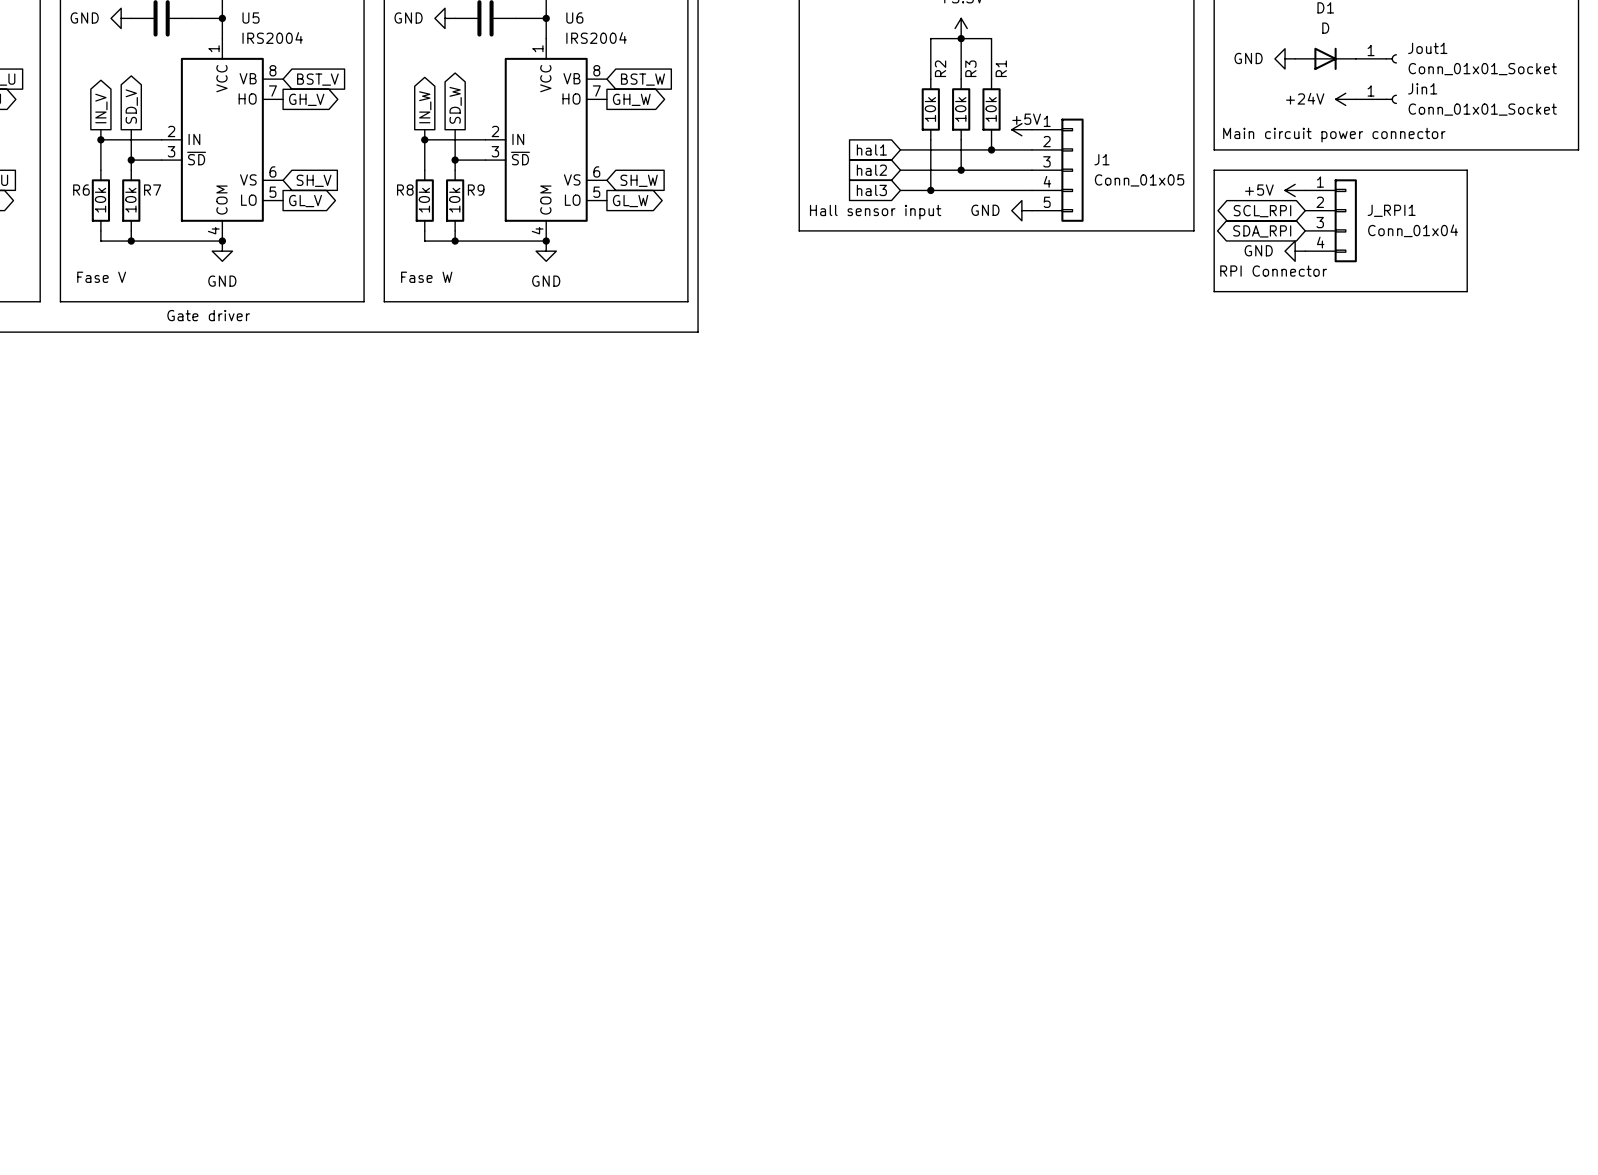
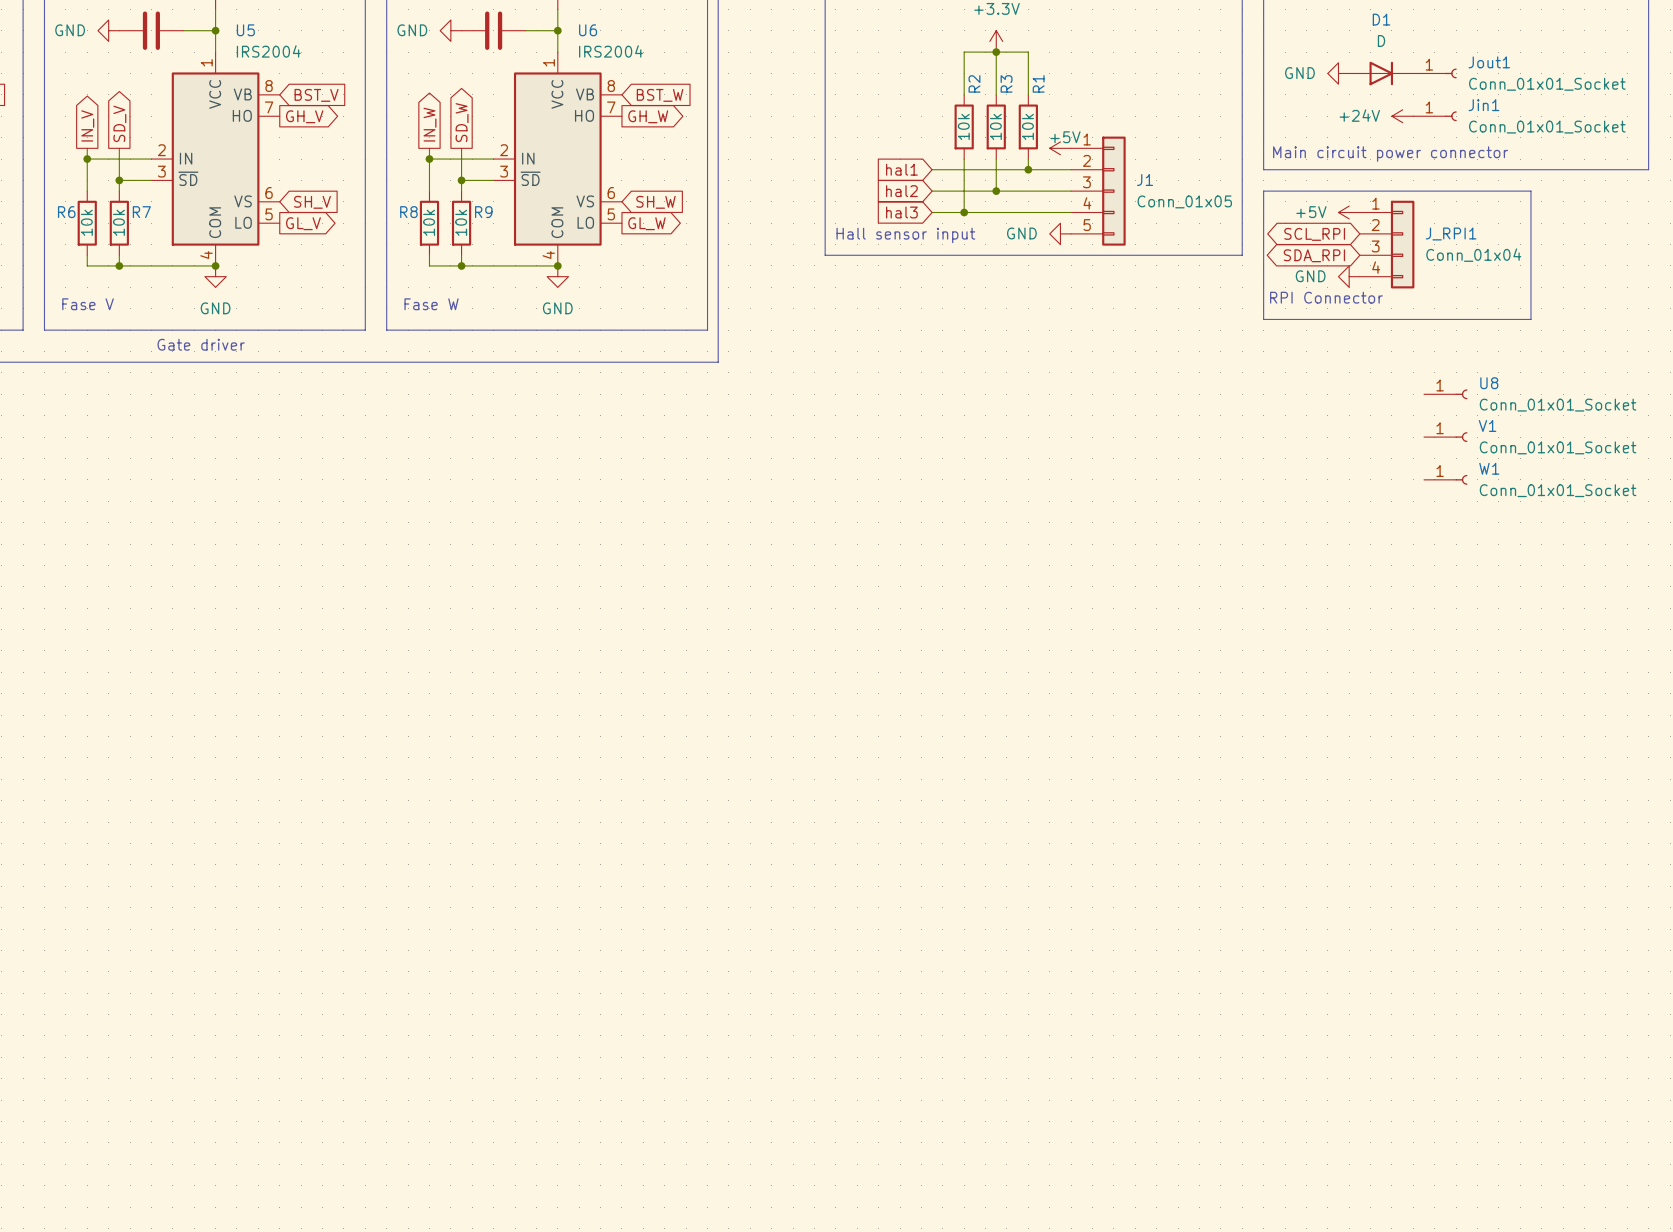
U8: none -> Conn_01x01_Socket (1445, 394)
V1: none -> Conn_01x01_Socket (1445, 437)
W1: none -> Conn_01x01_Socket (1445, 479)

